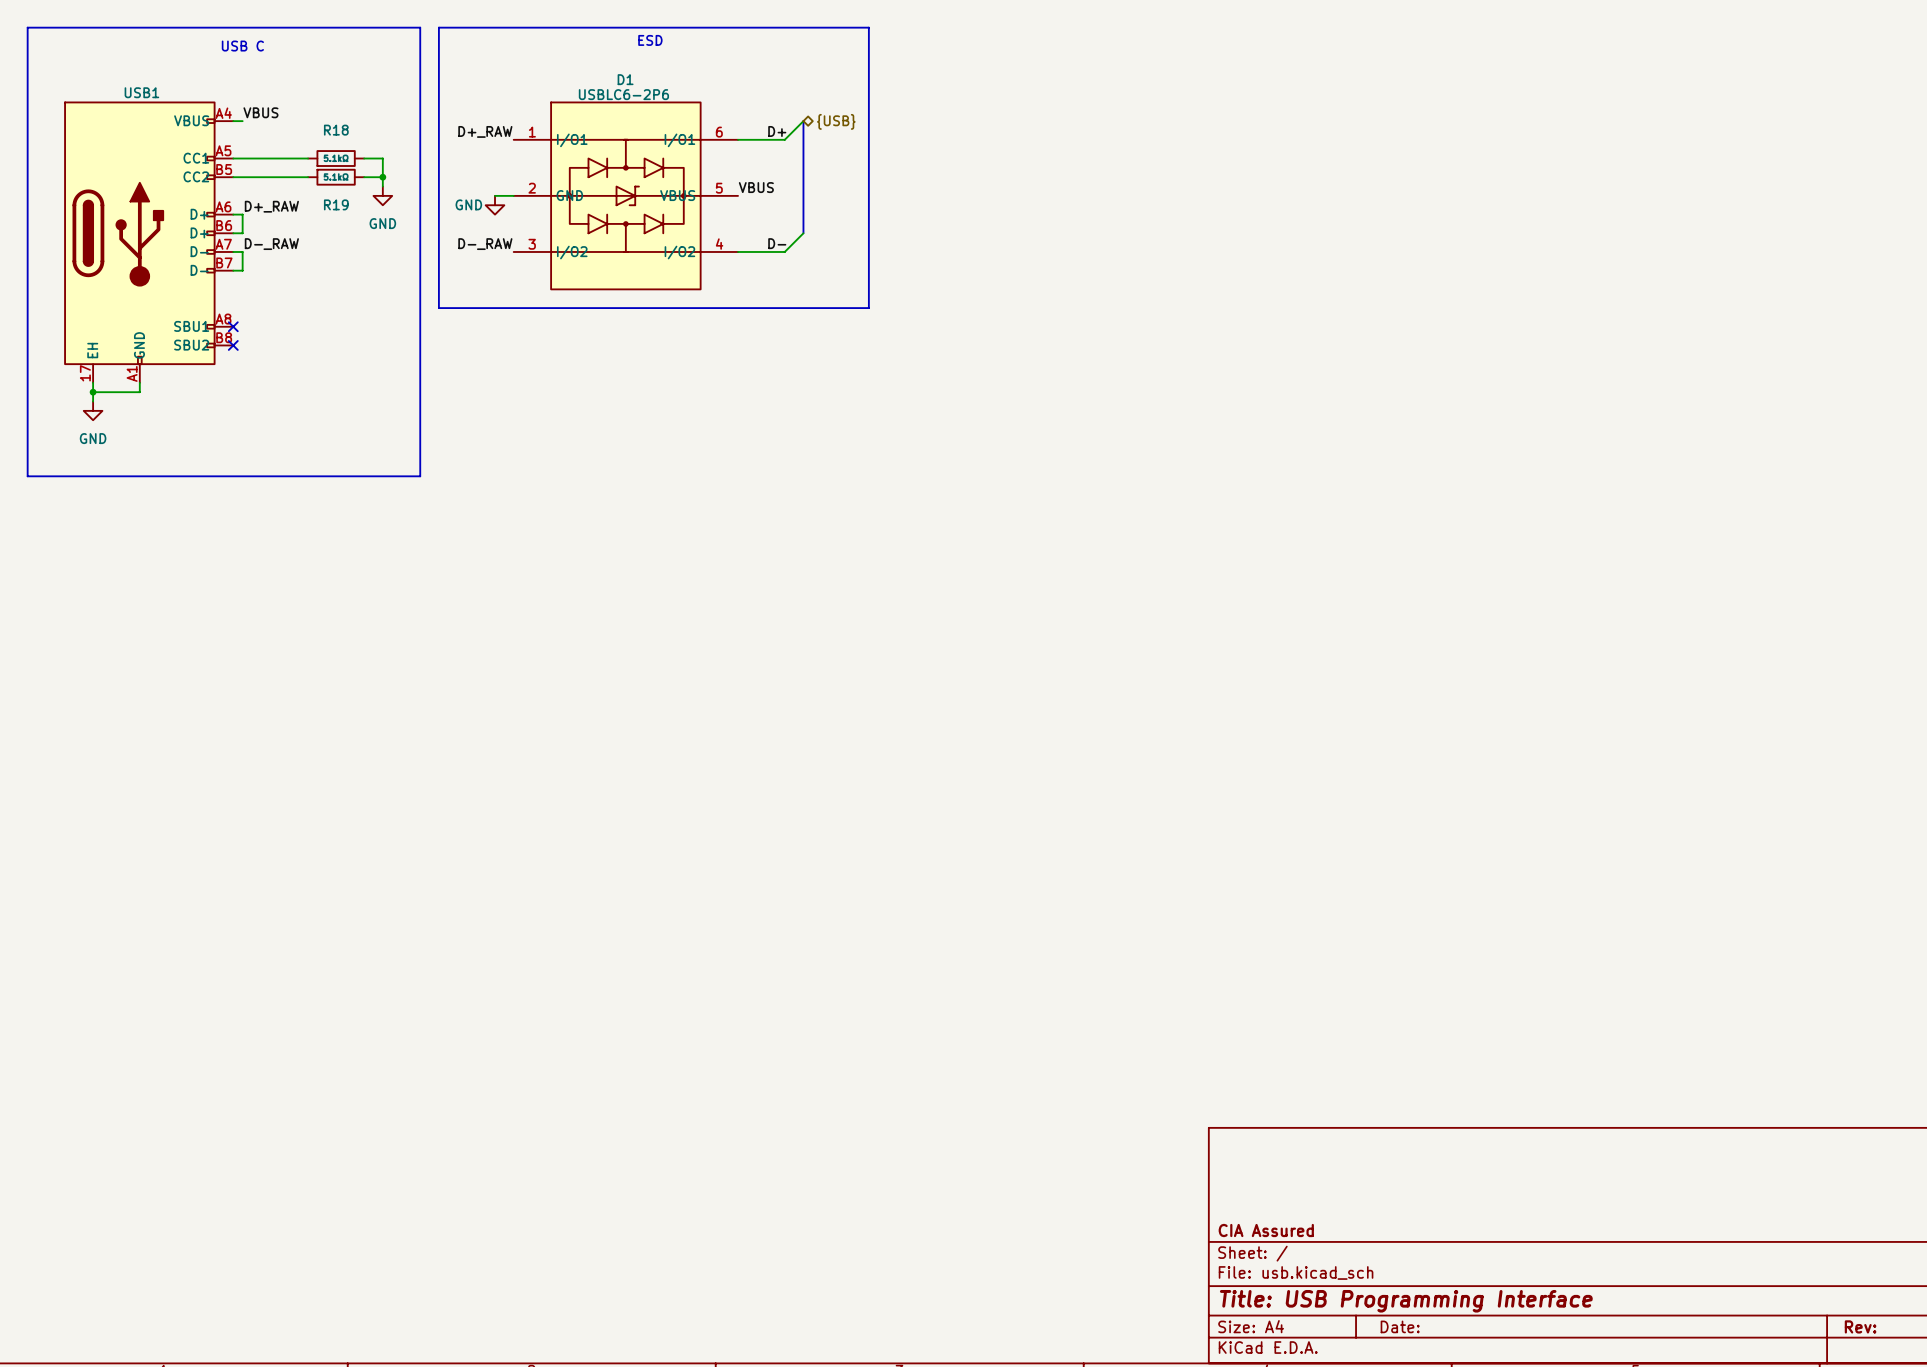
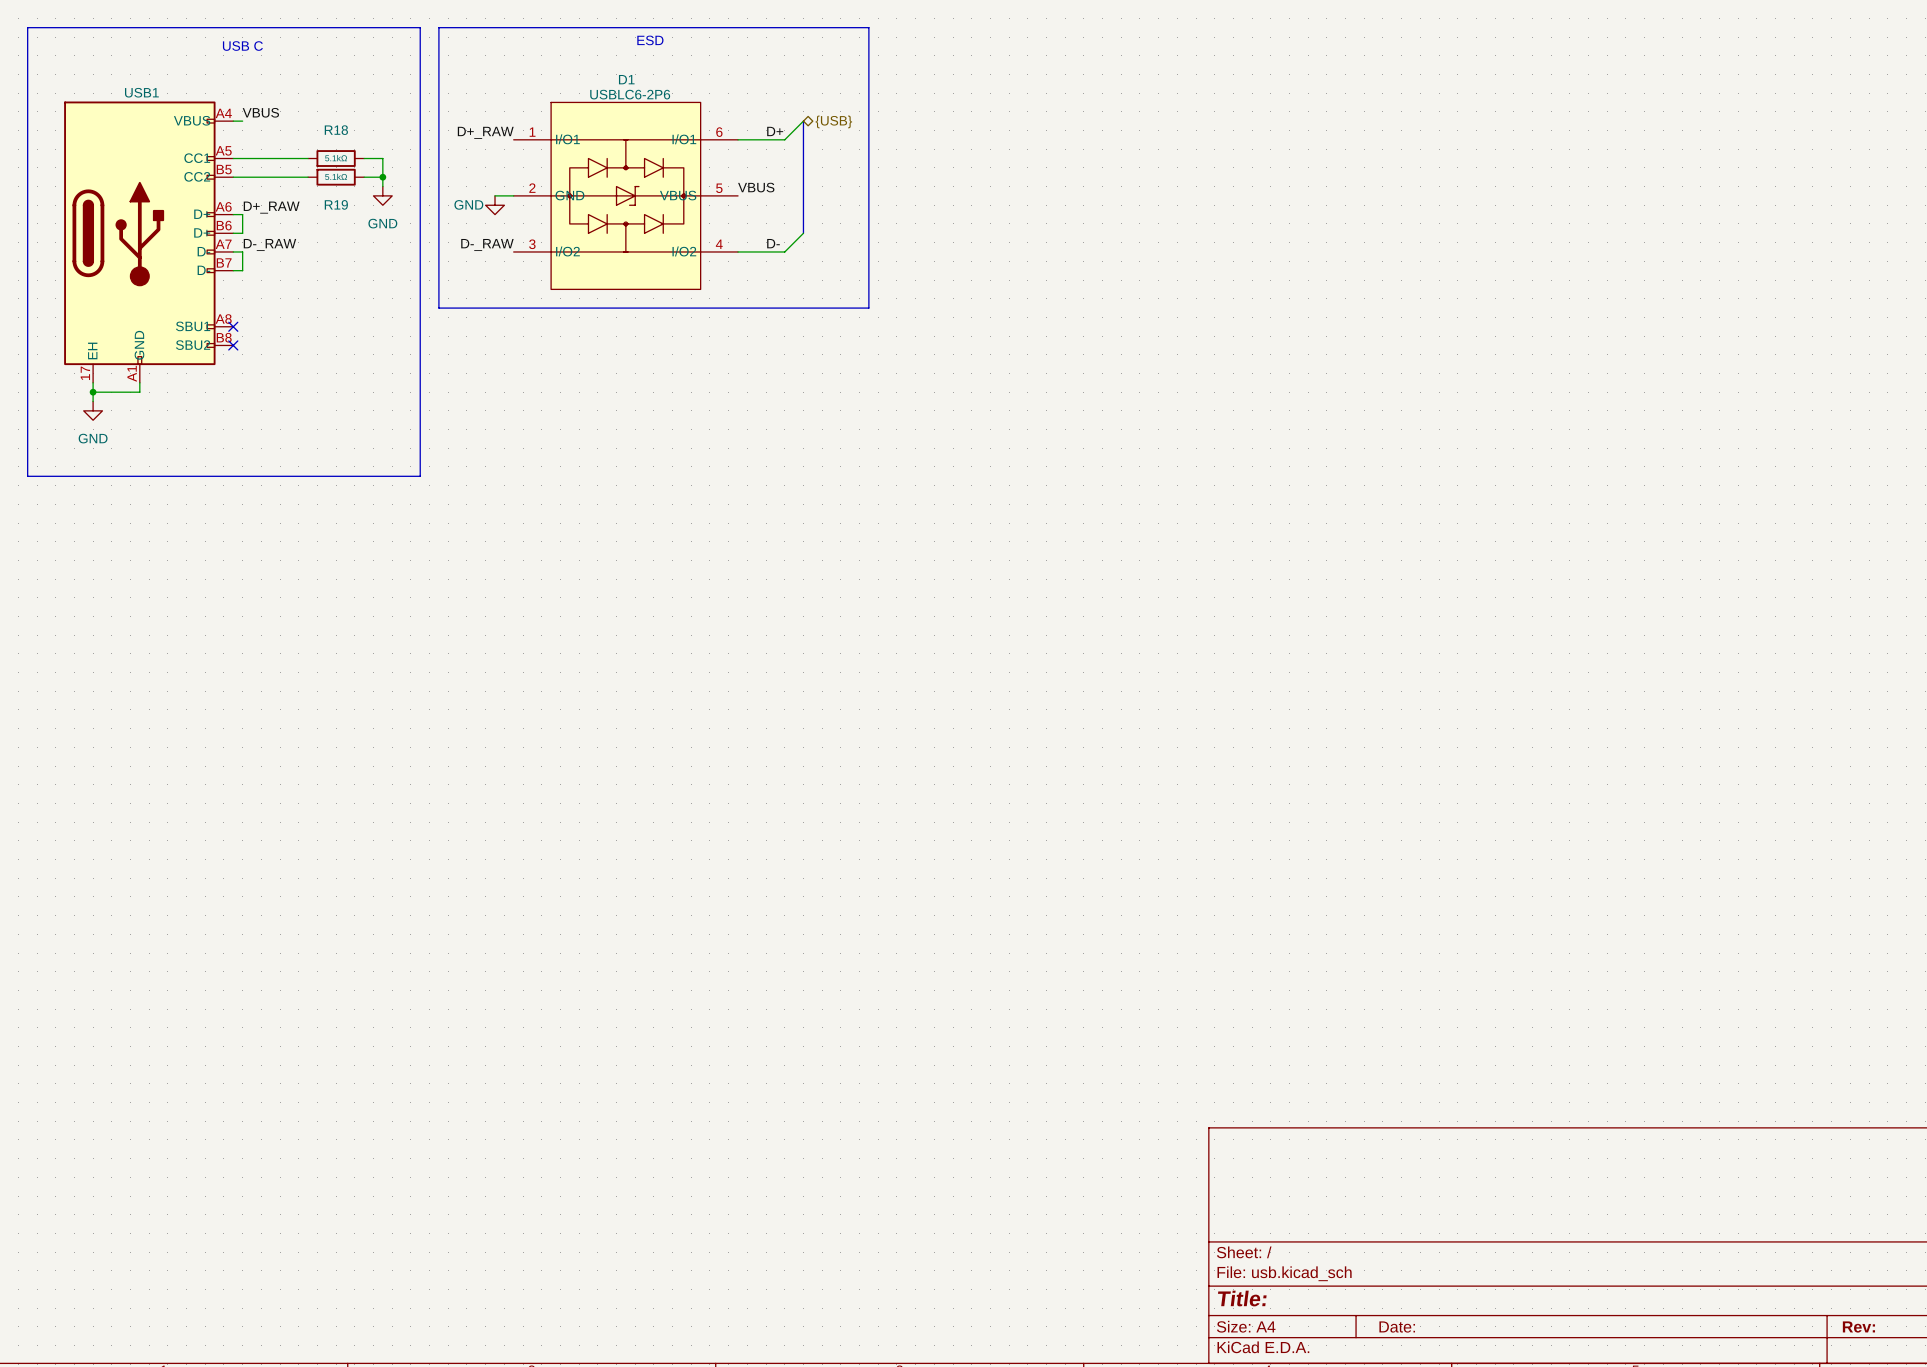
title block: CIA Assured (1266, 1230) -> none
title block: Title: USB Programming Interface (1406, 1301) -> Title: (1242, 1298)

